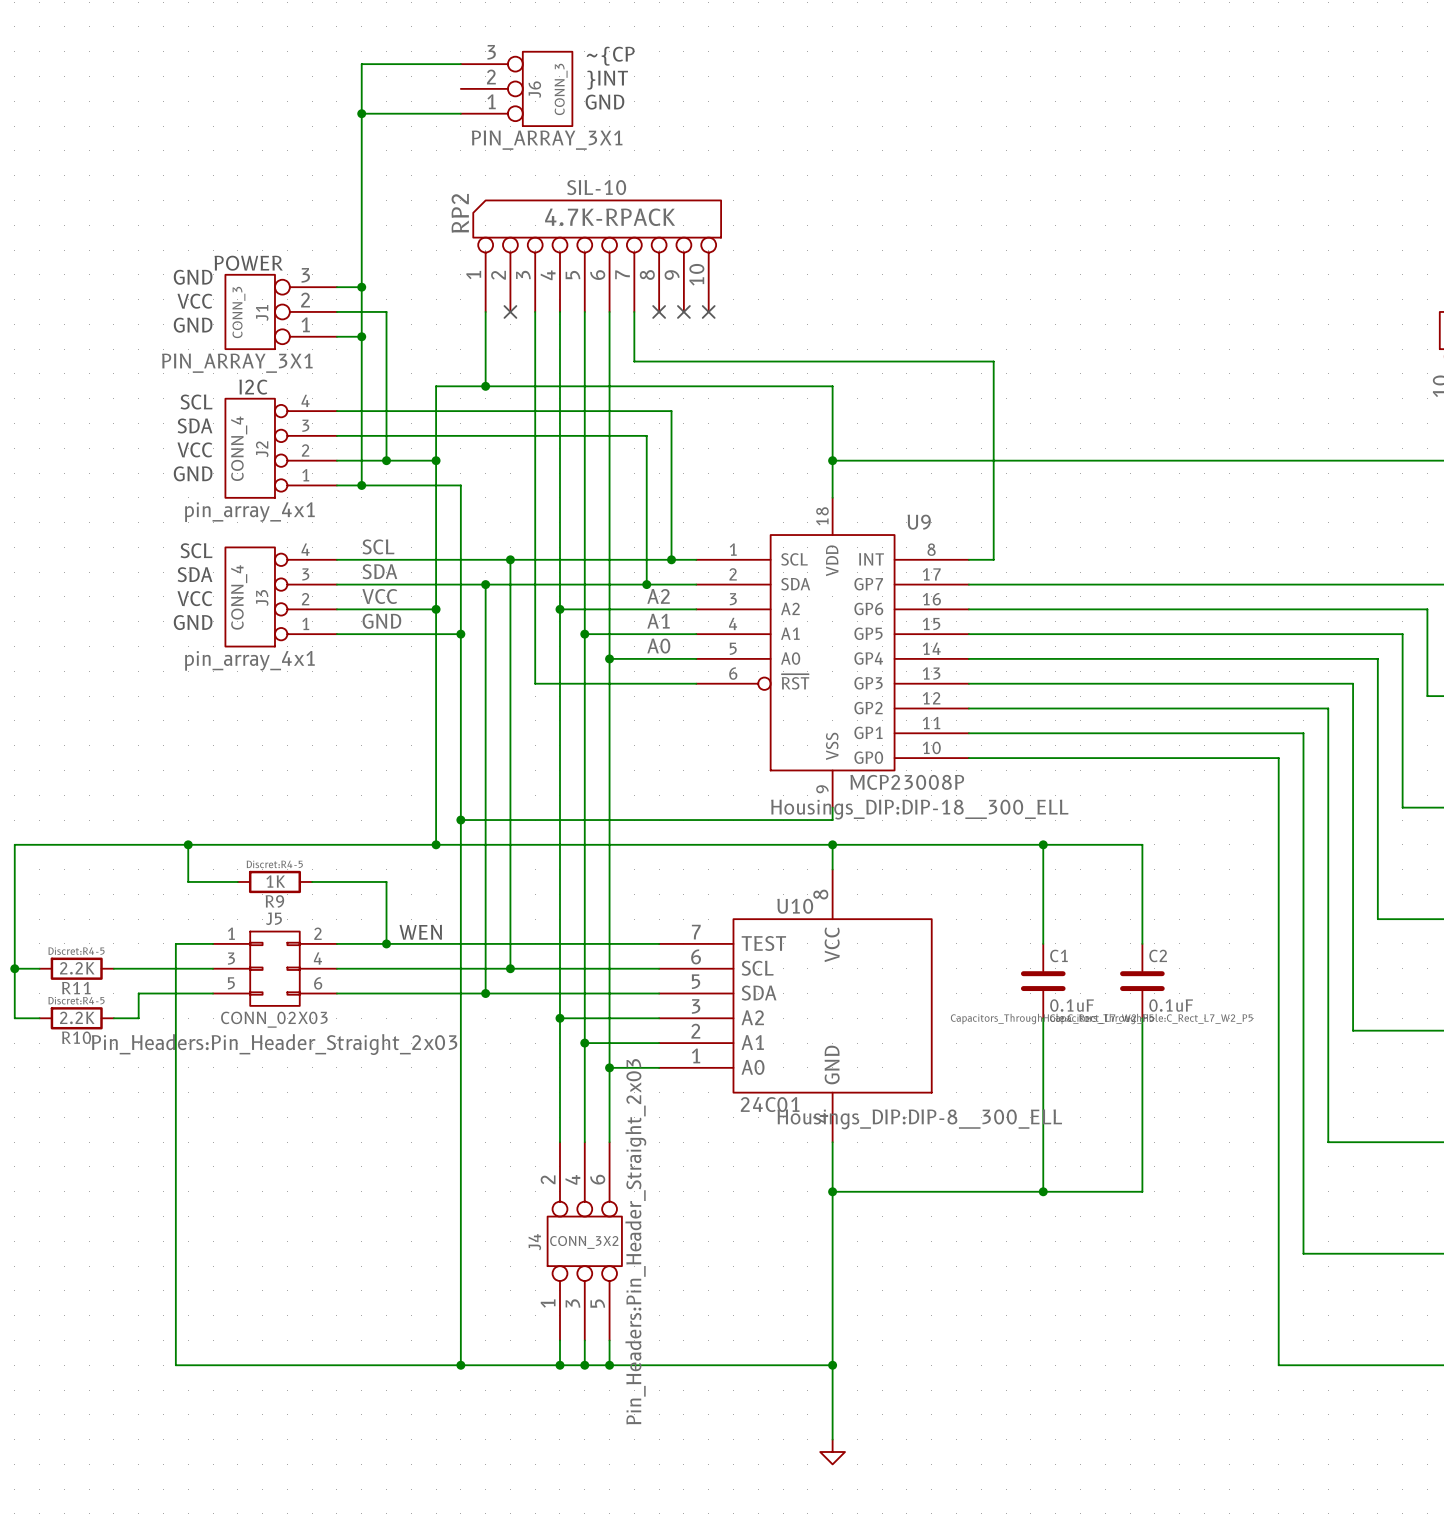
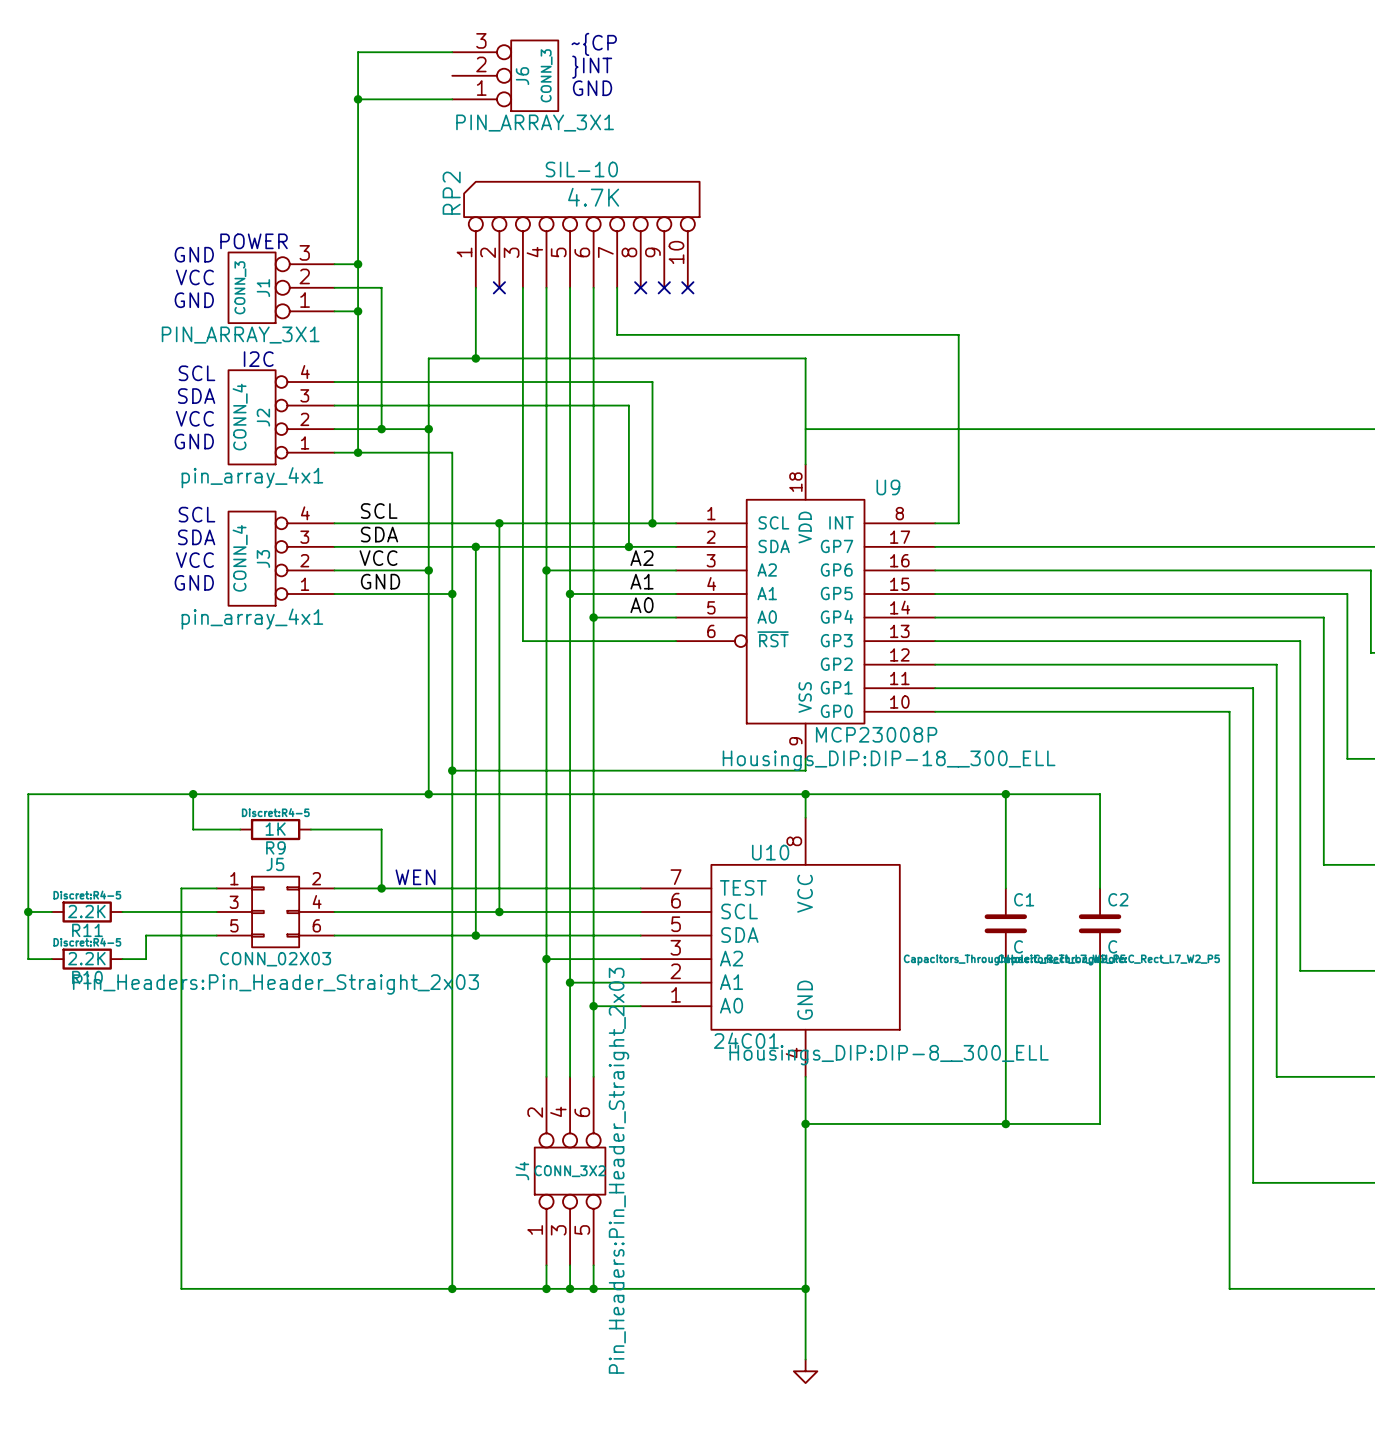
RP2 value: 4.7K-RPACK (610, 217) -> 4.7K (593, 197)
junction: (832, 460) -> none
C1 value: 0.1uF (1072, 1005) -> C (1018, 946)
C2 value: 0.1uF (1171, 1005) -> C (1112, 946)

